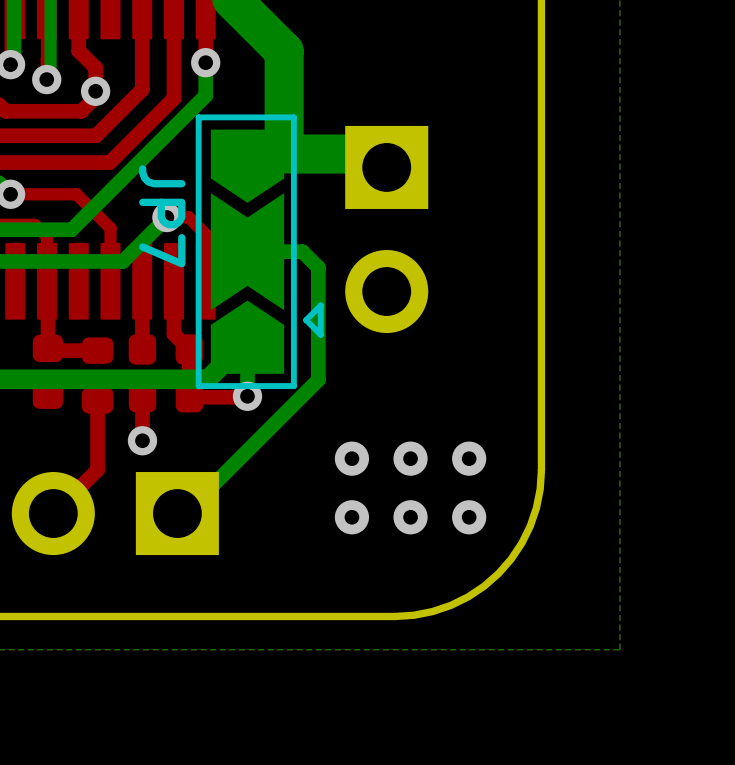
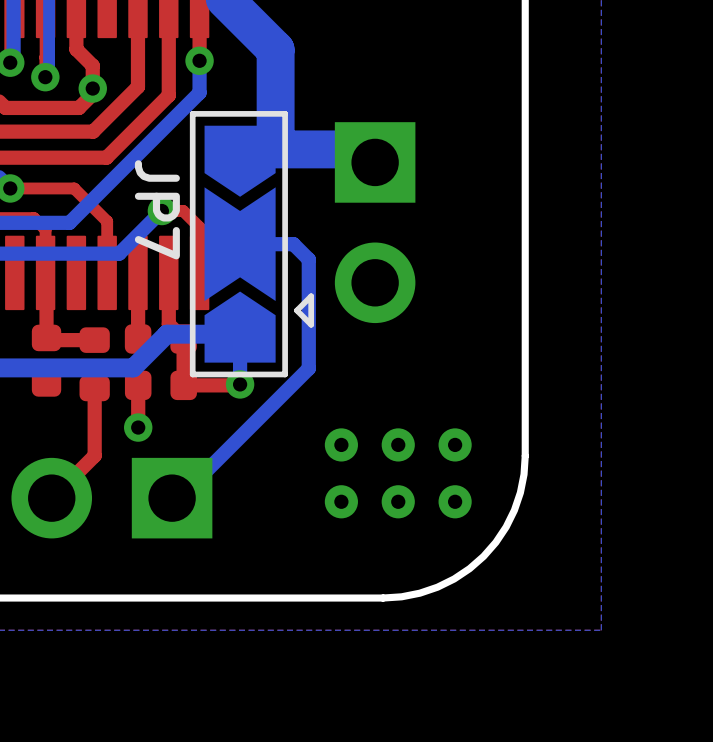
bottom track: (242, 344) (207, 379) (137, 379) -> (235, 334) (166, 334) (133, 367)

